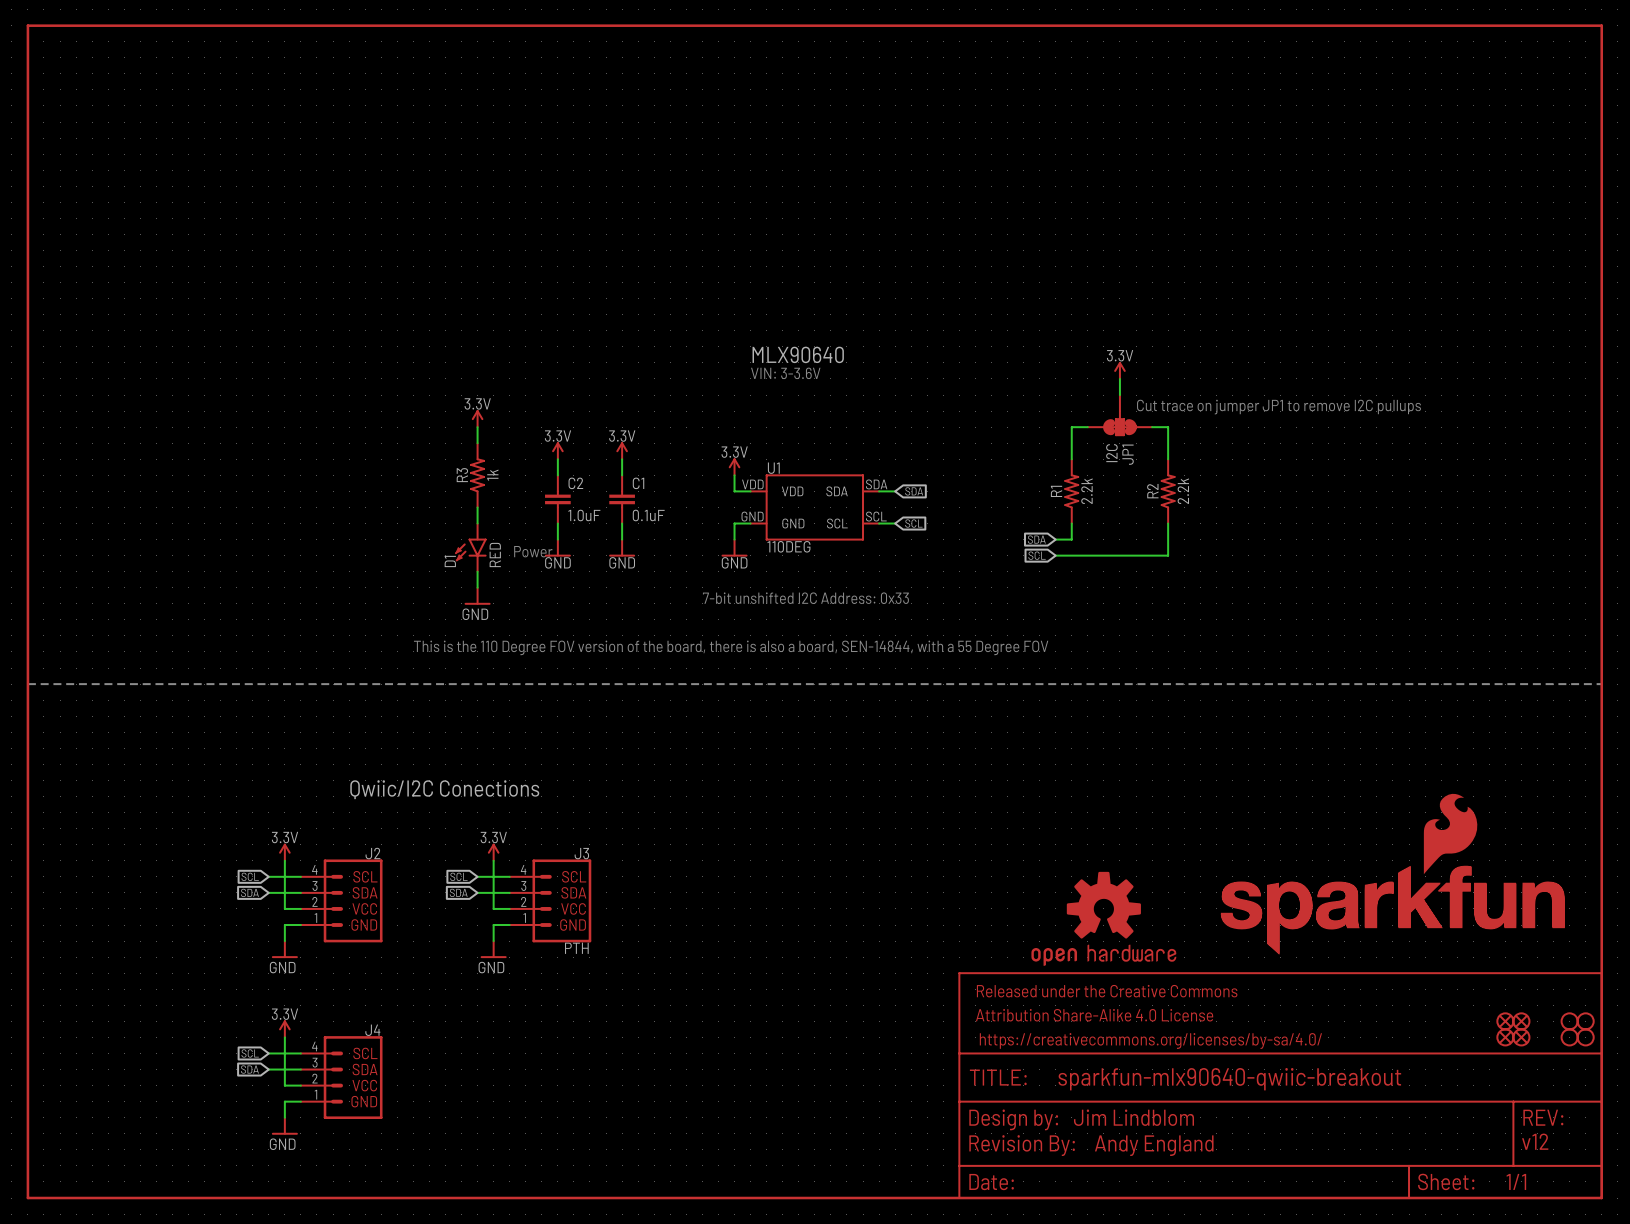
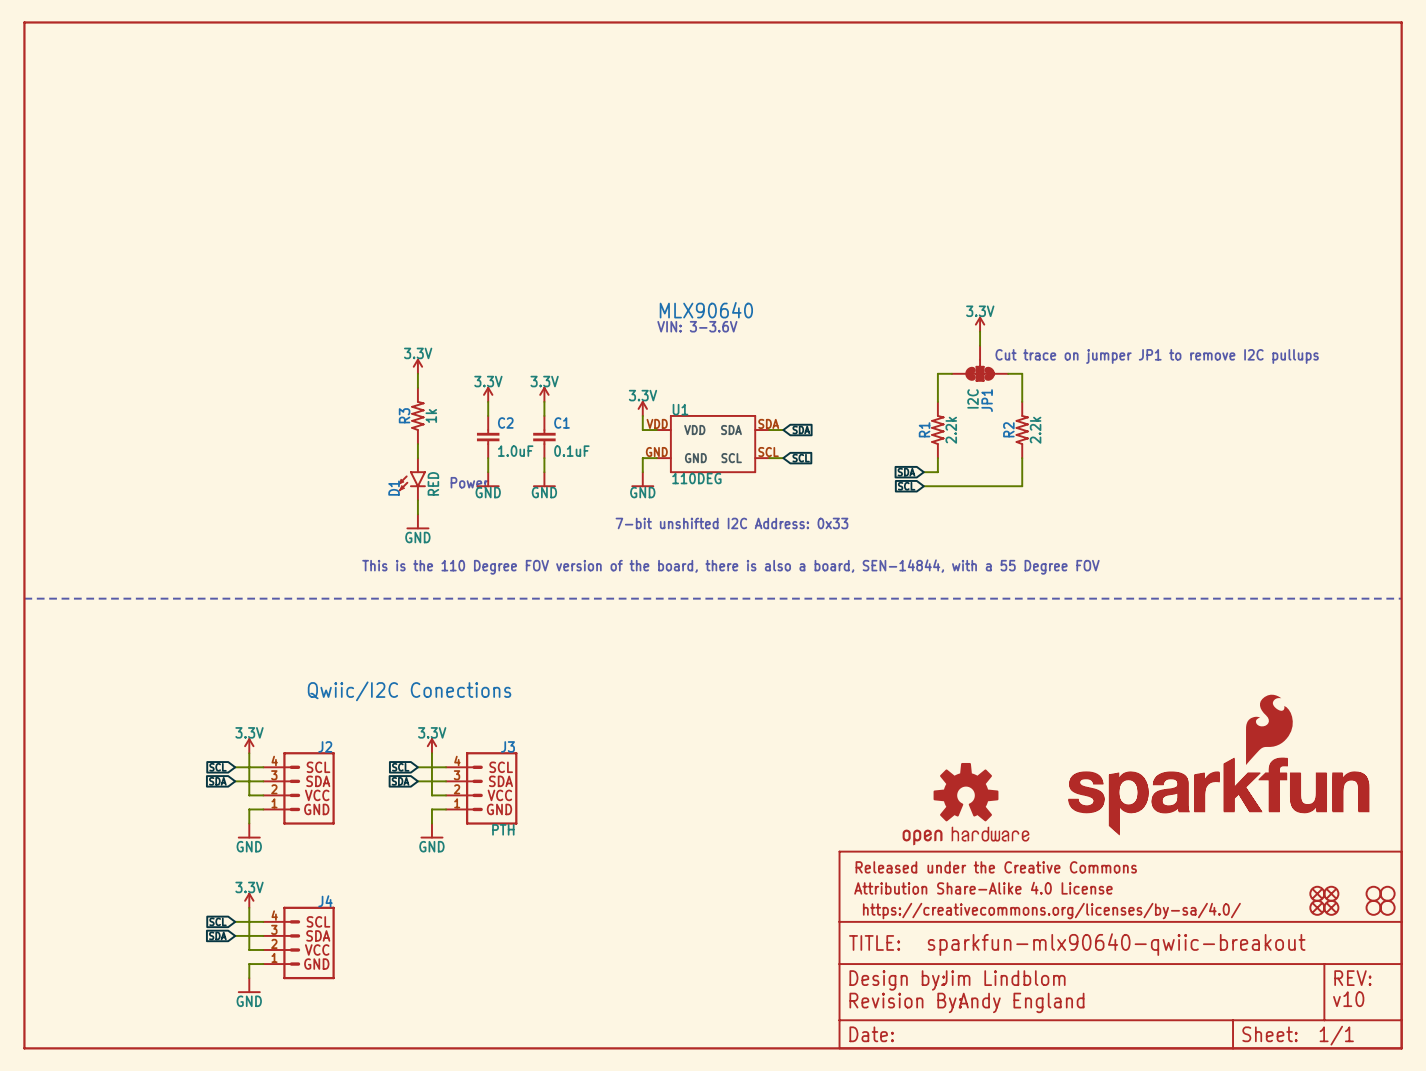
text: v12 (1535, 1141) -> v10 (1348, 999)

